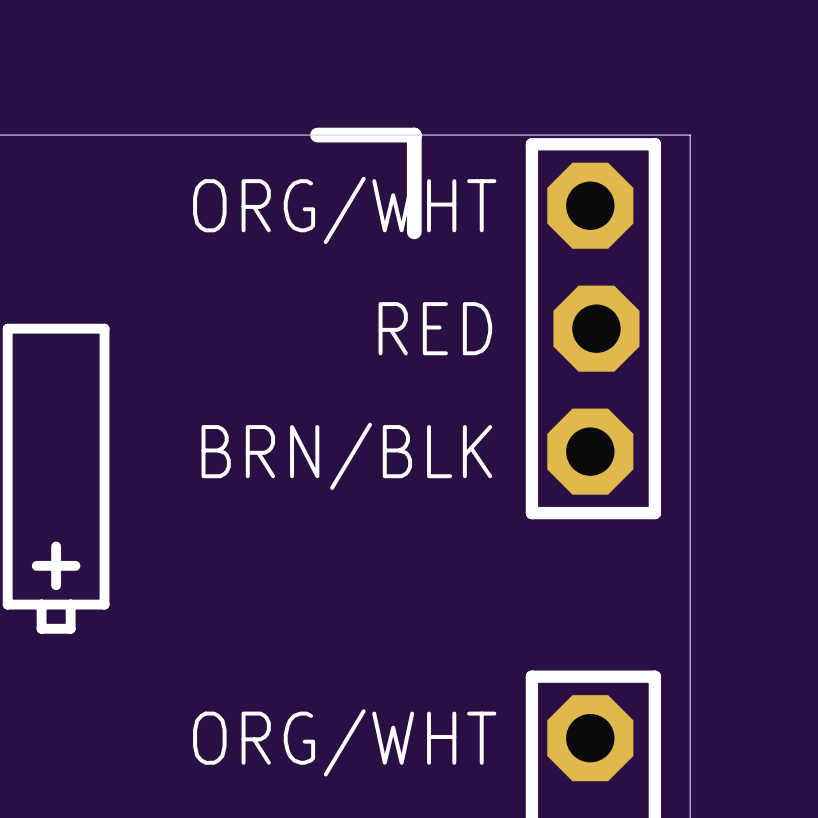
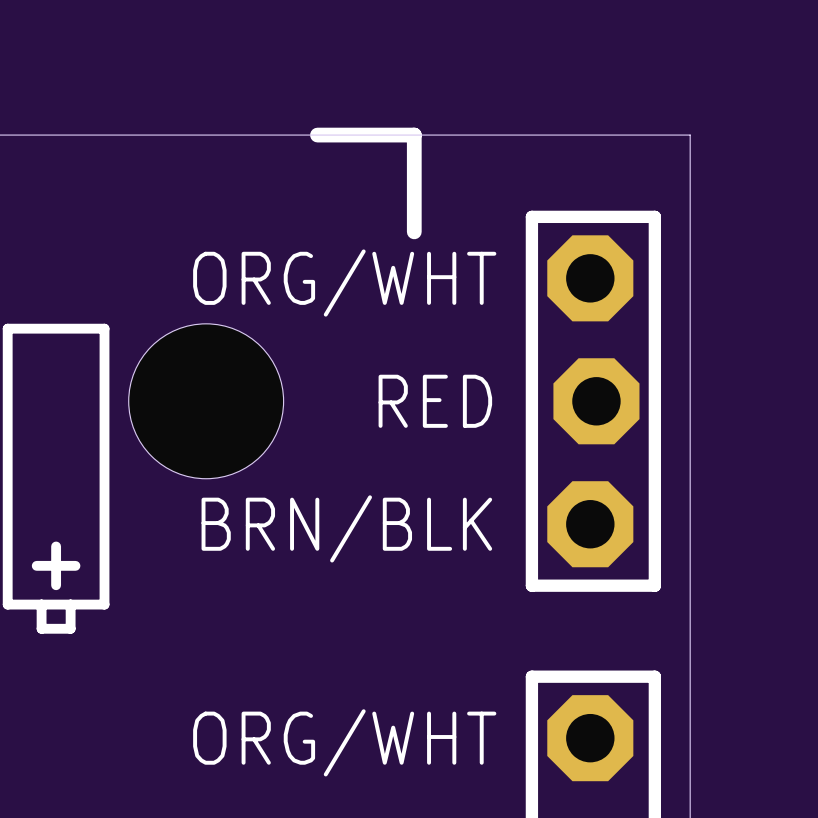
part position: (593, 328) -> (593, 401)
hole: none -> (206, 401)

